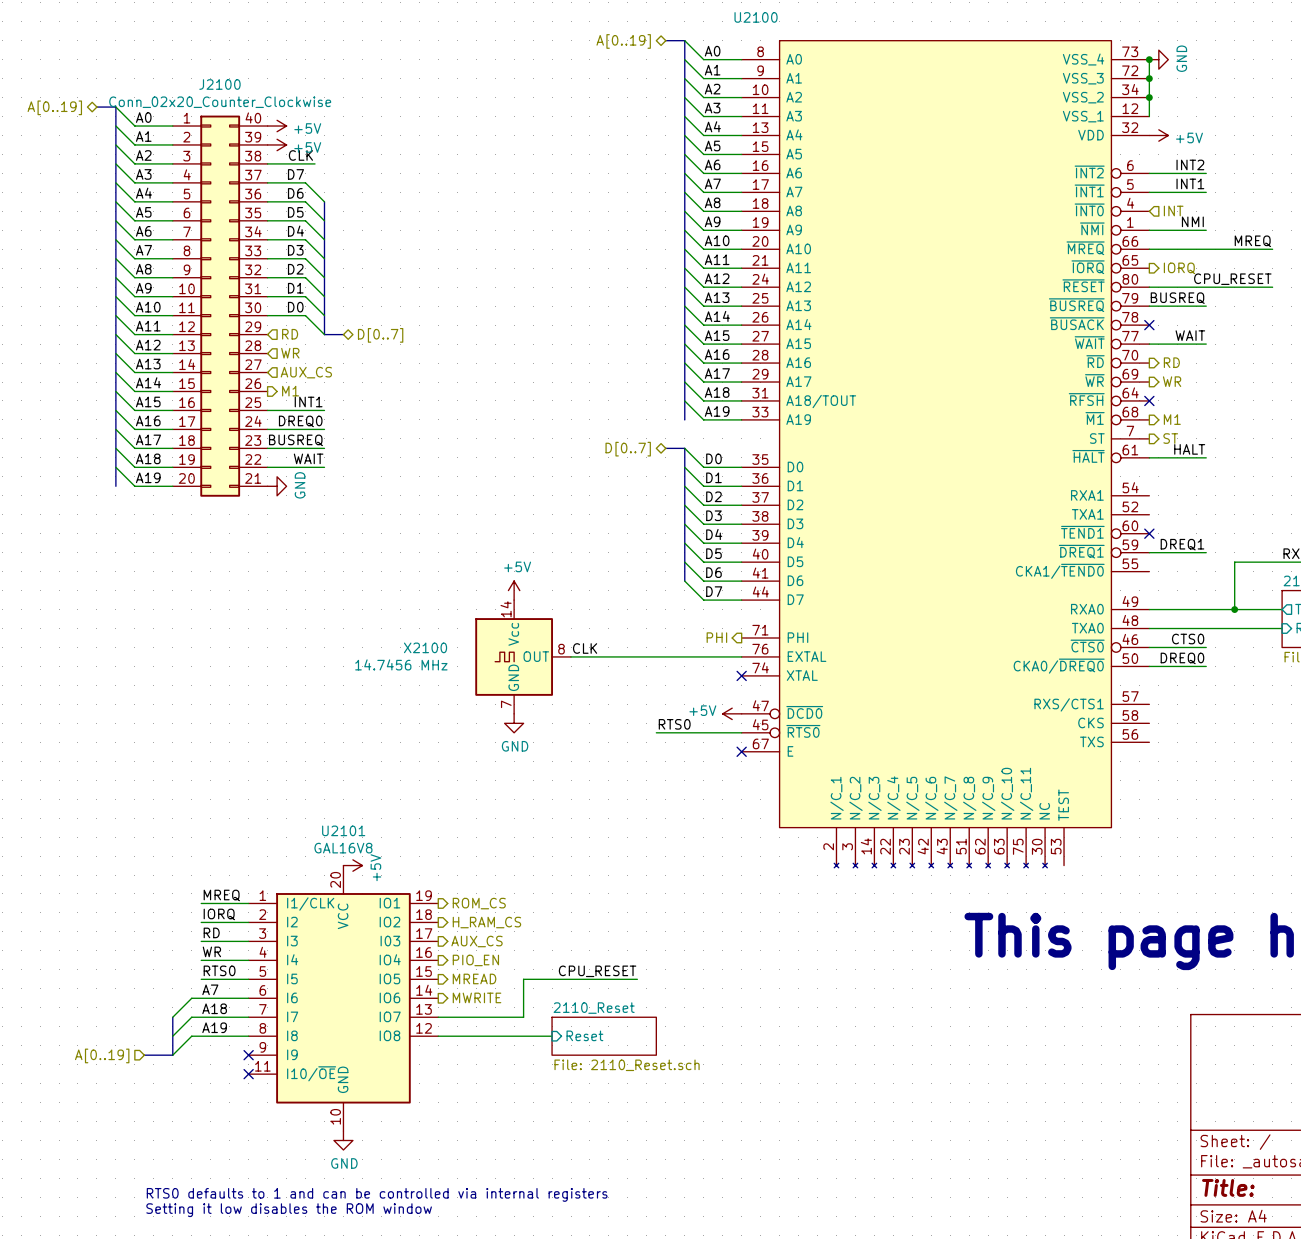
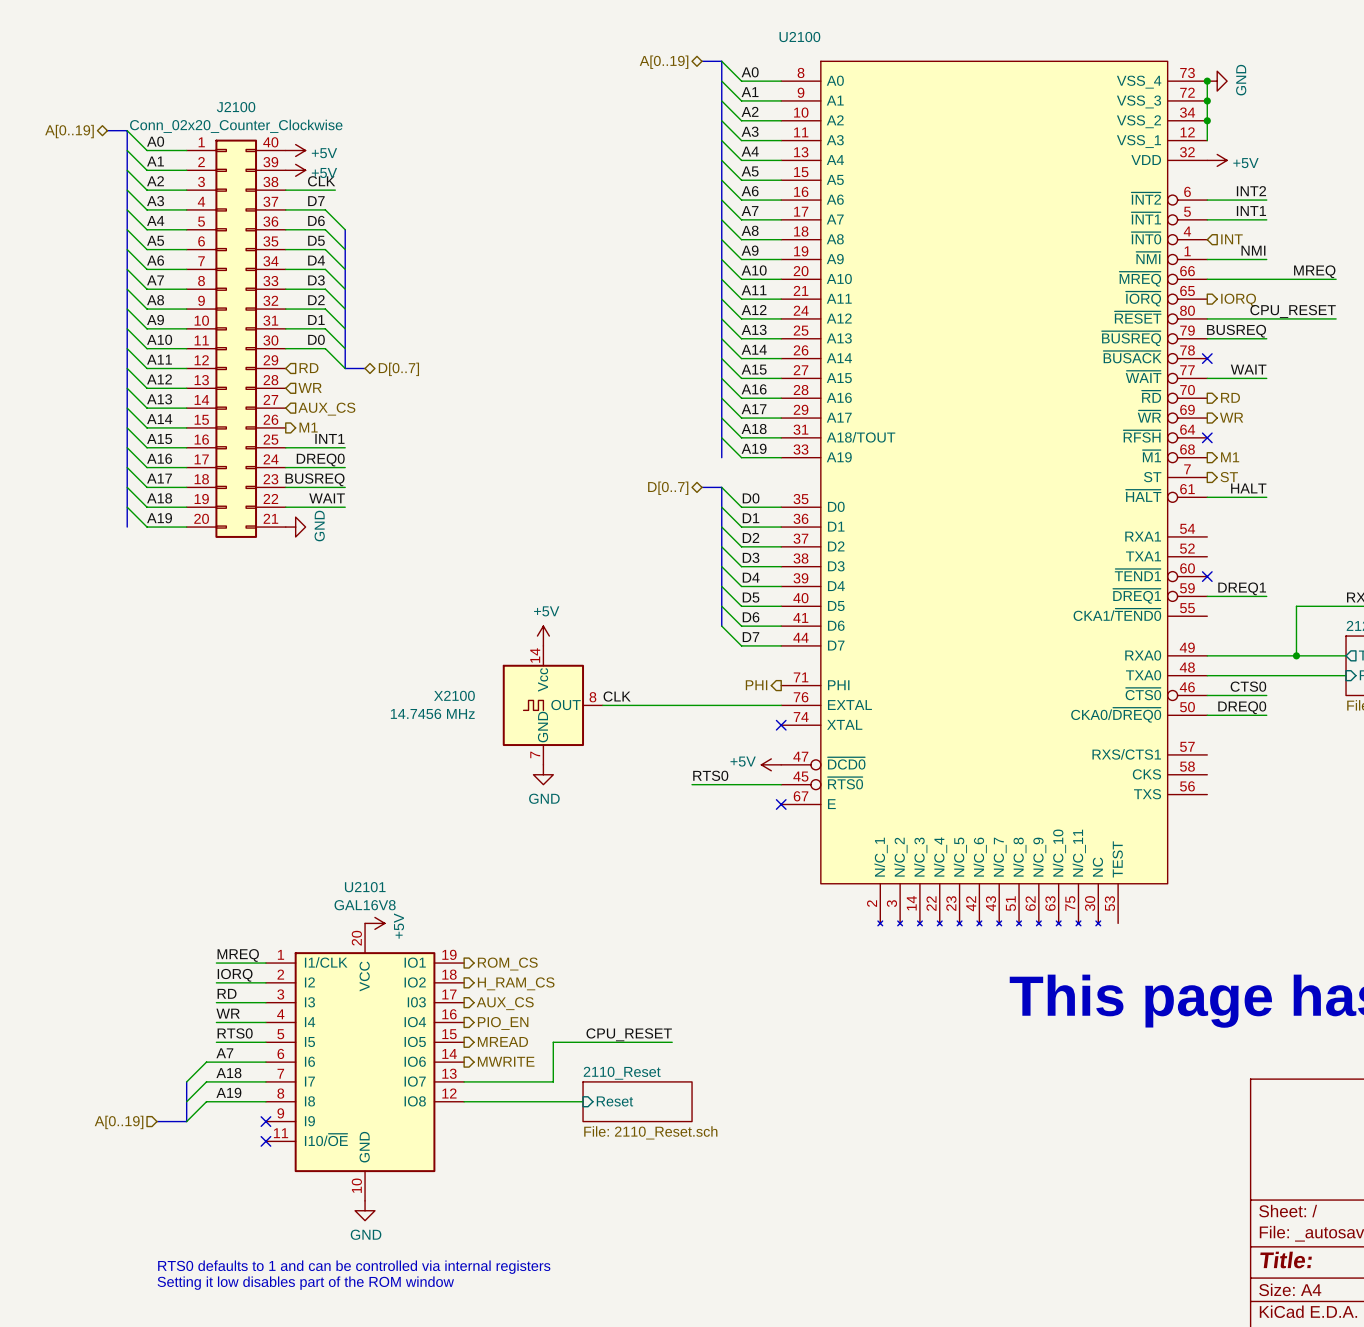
text: Setting it low disables the ROM window (289, 1210) -> Setting it low disables part of the ROM window (305, 1283)

